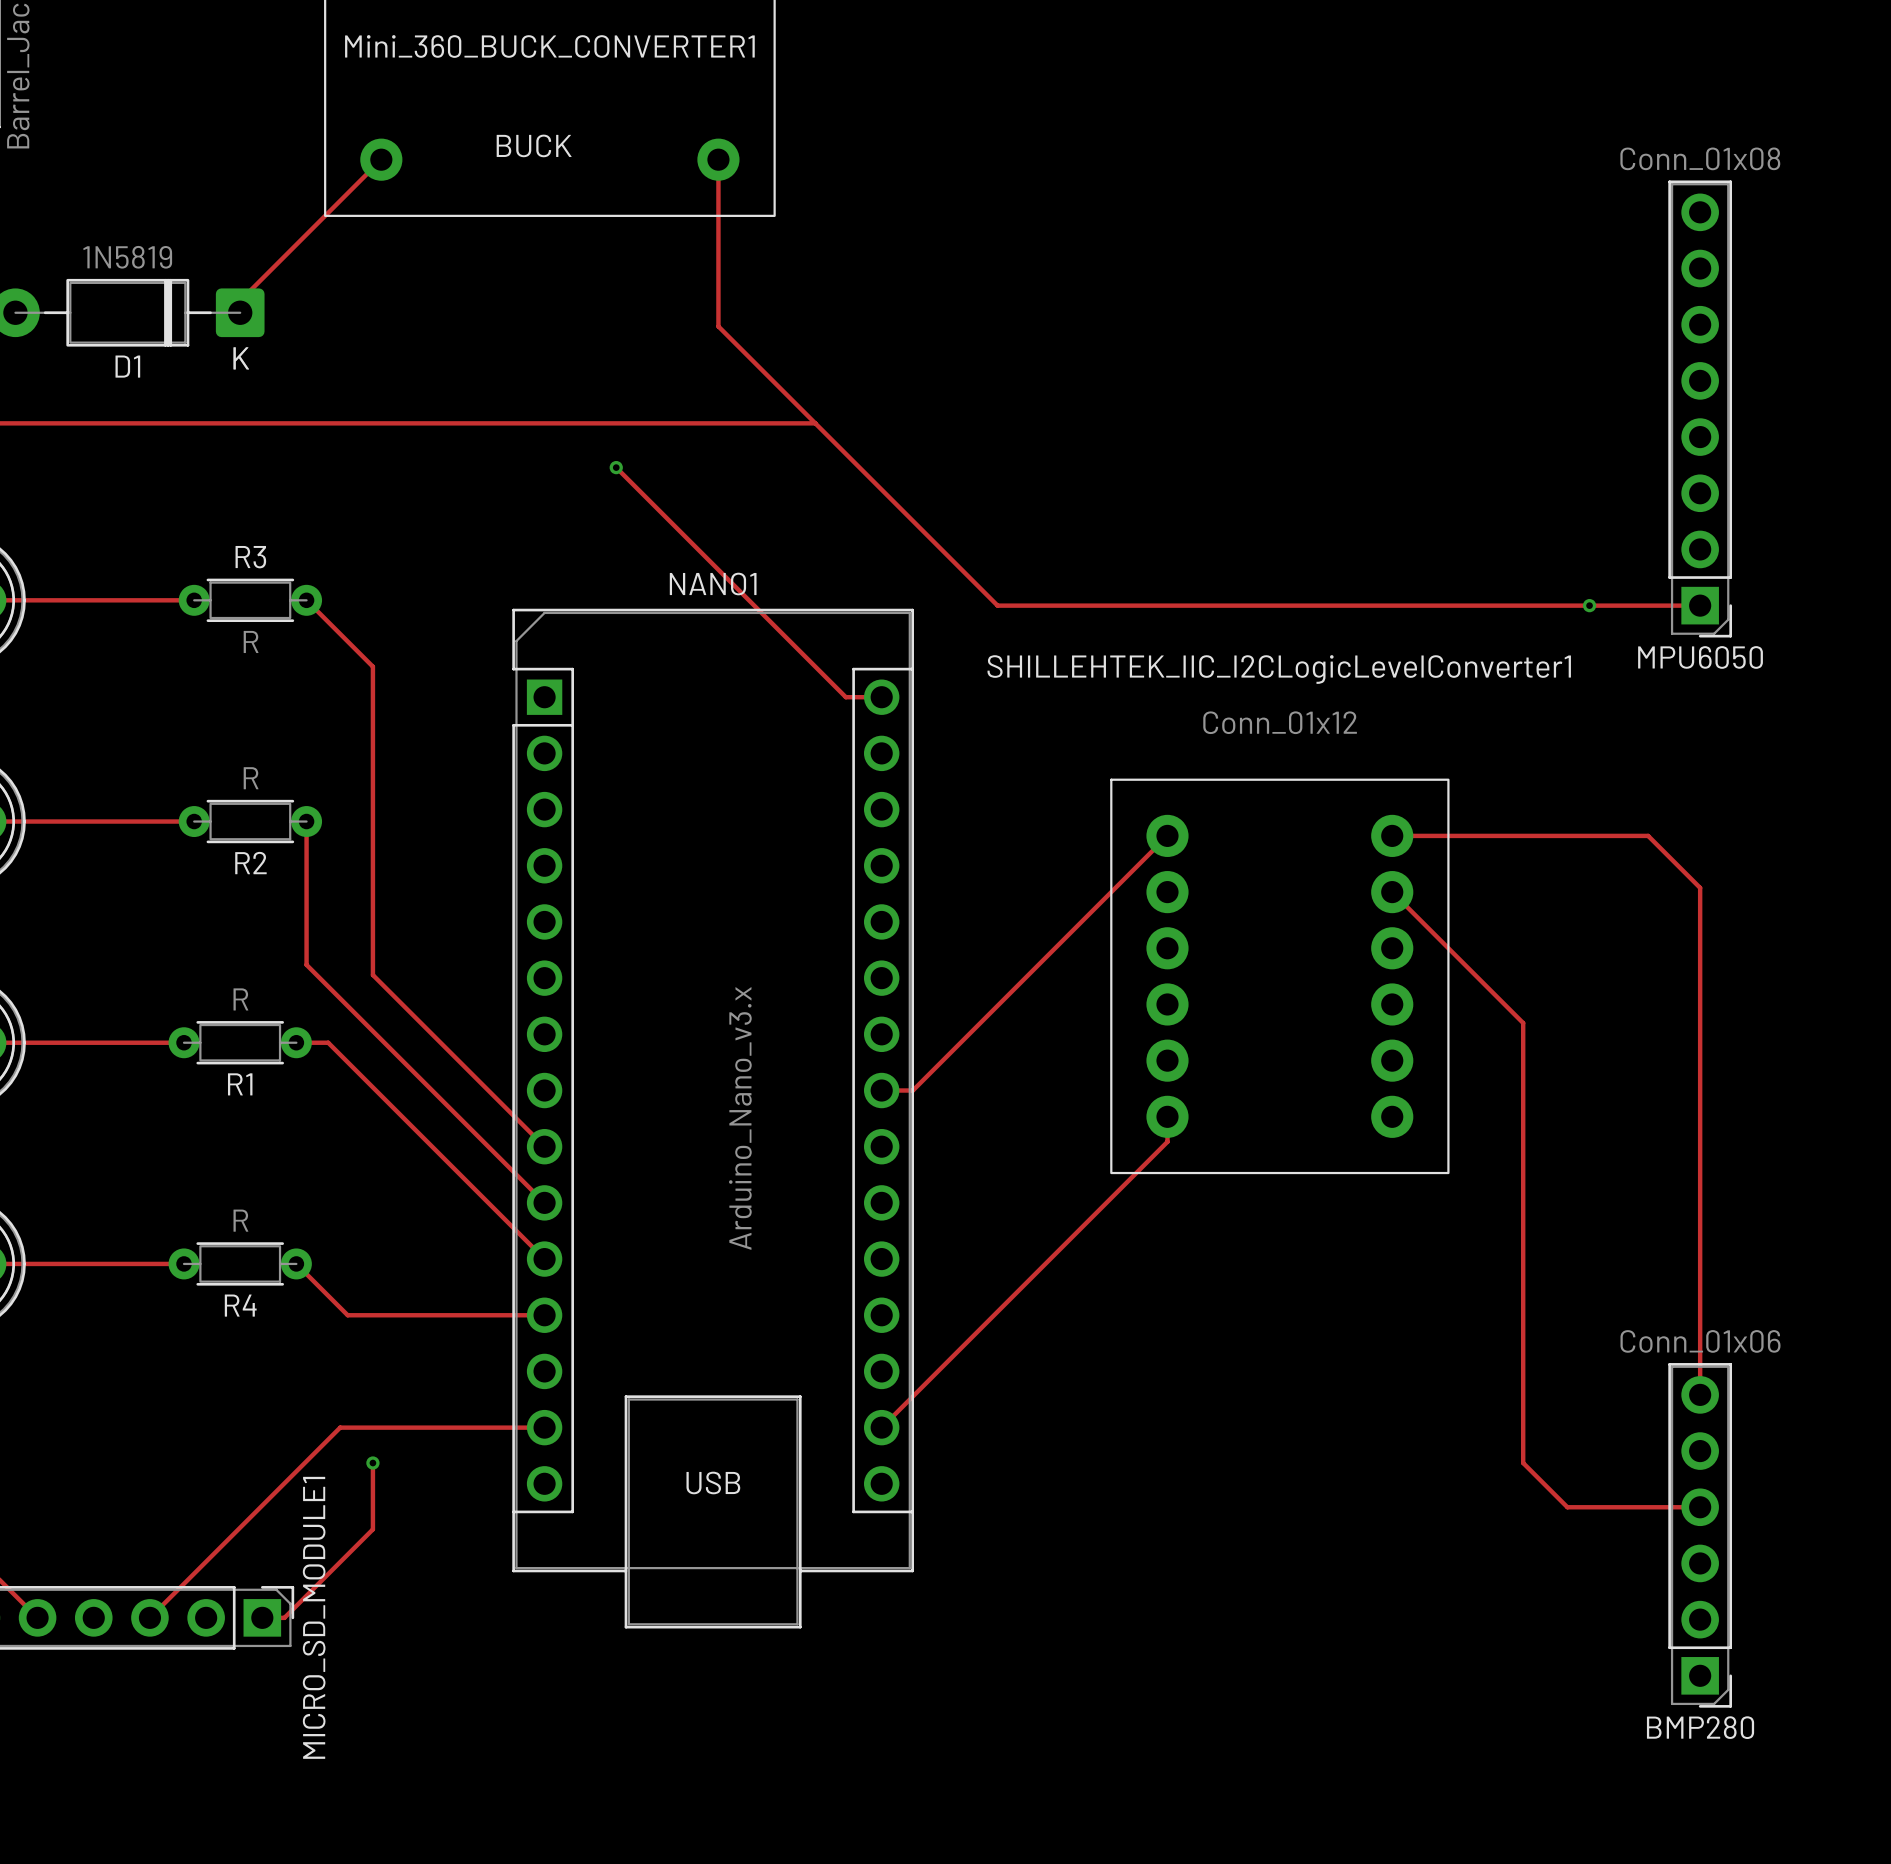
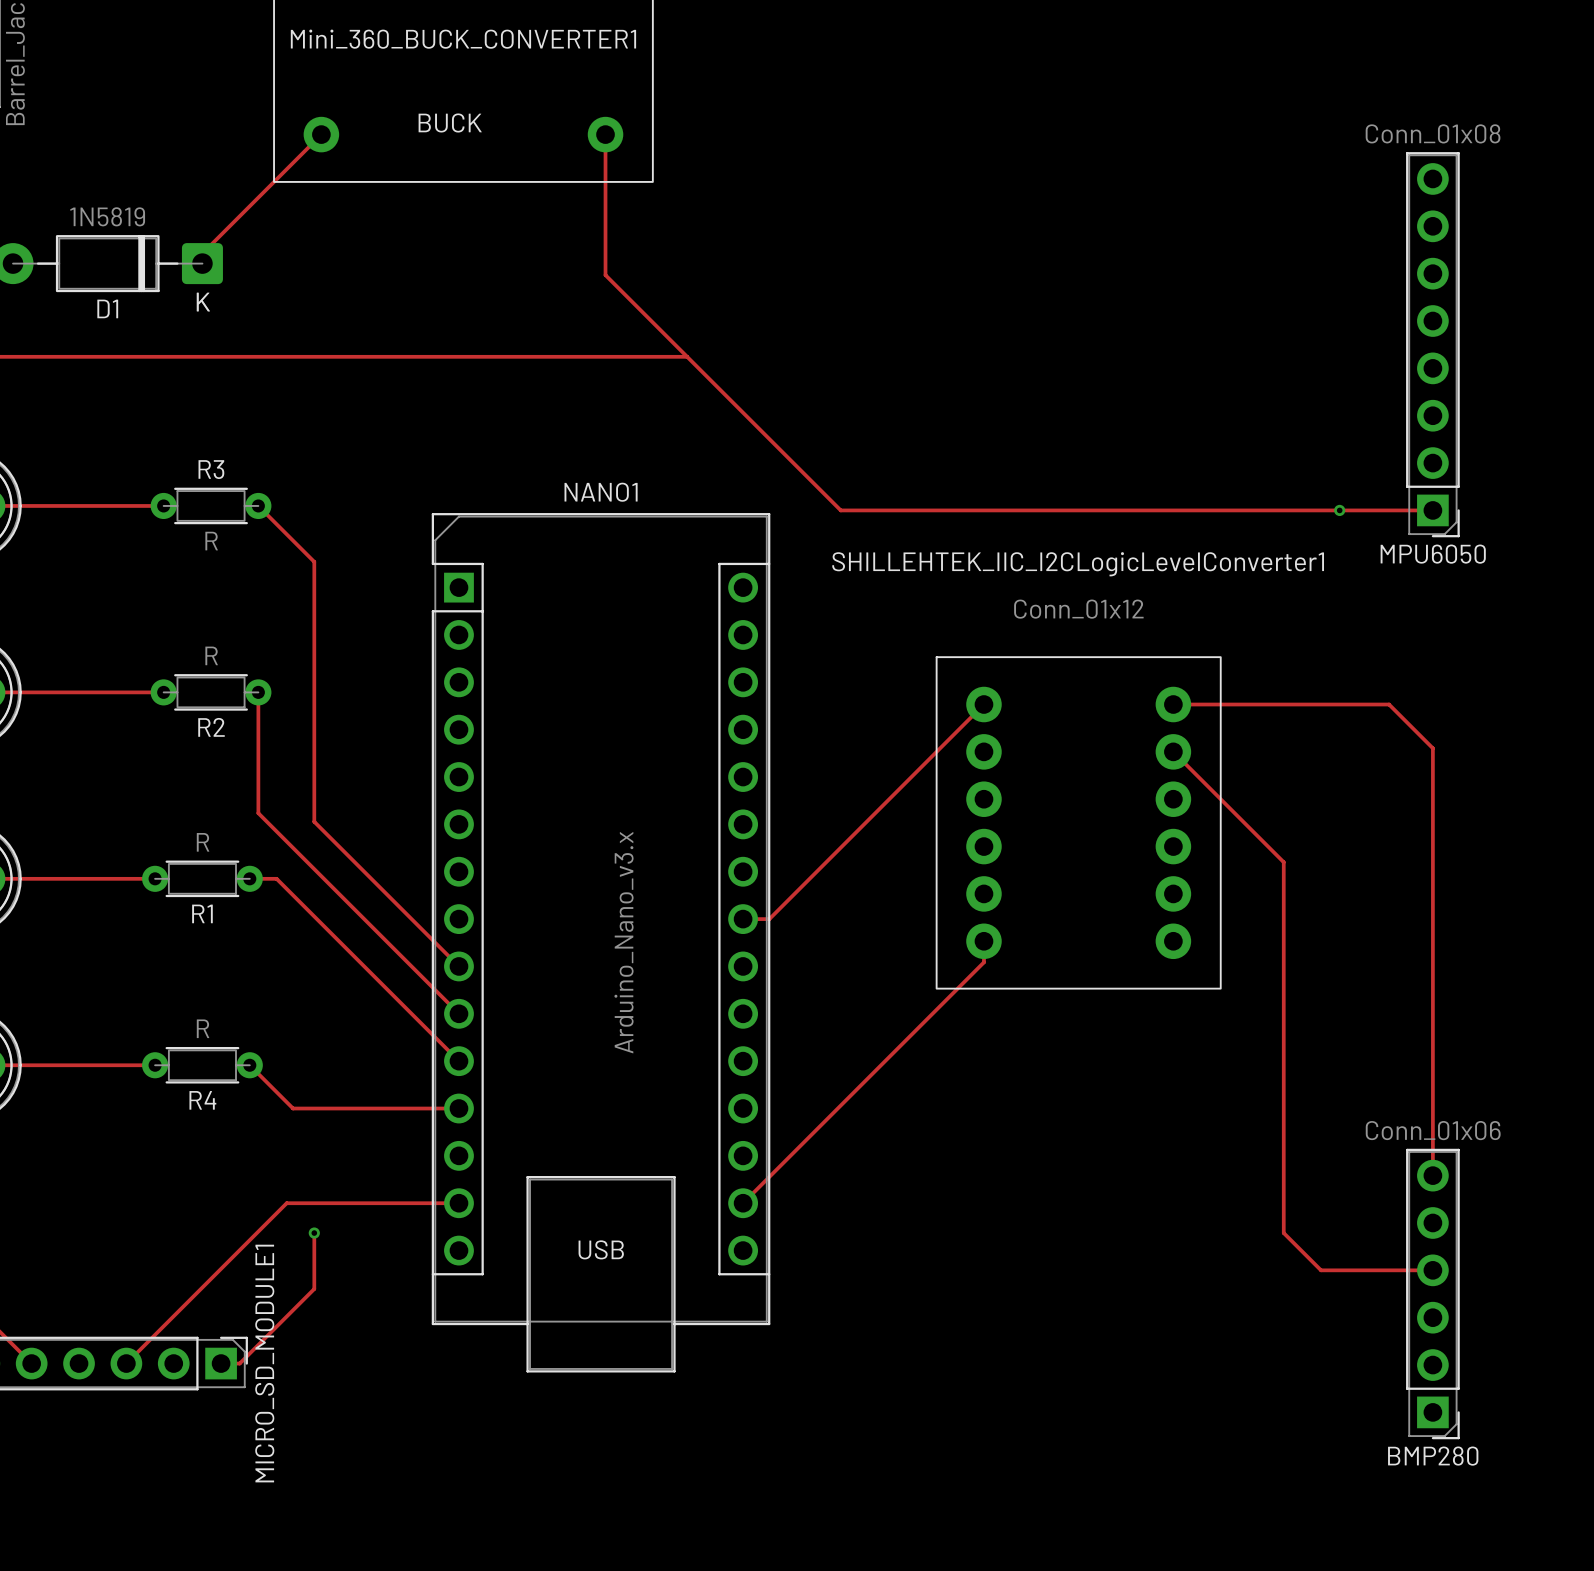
track: (616, 467) (845, 697) (881, 697) -> none
via: (616, 467) -> none

